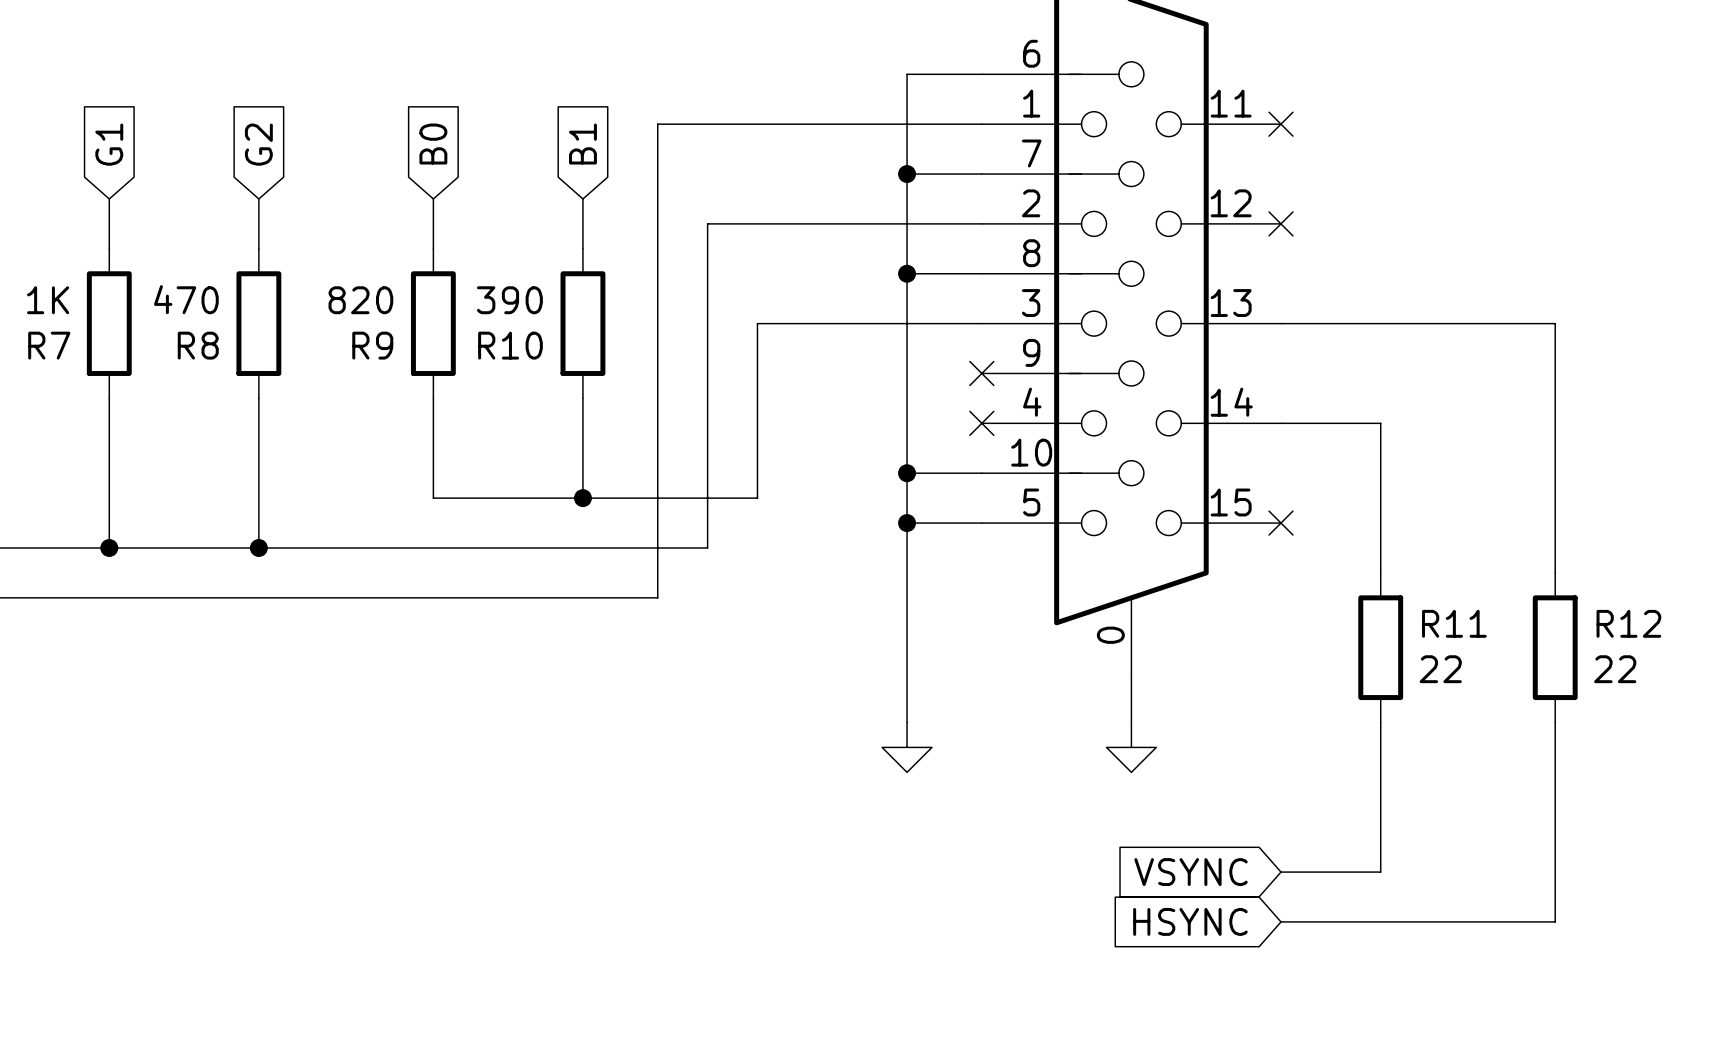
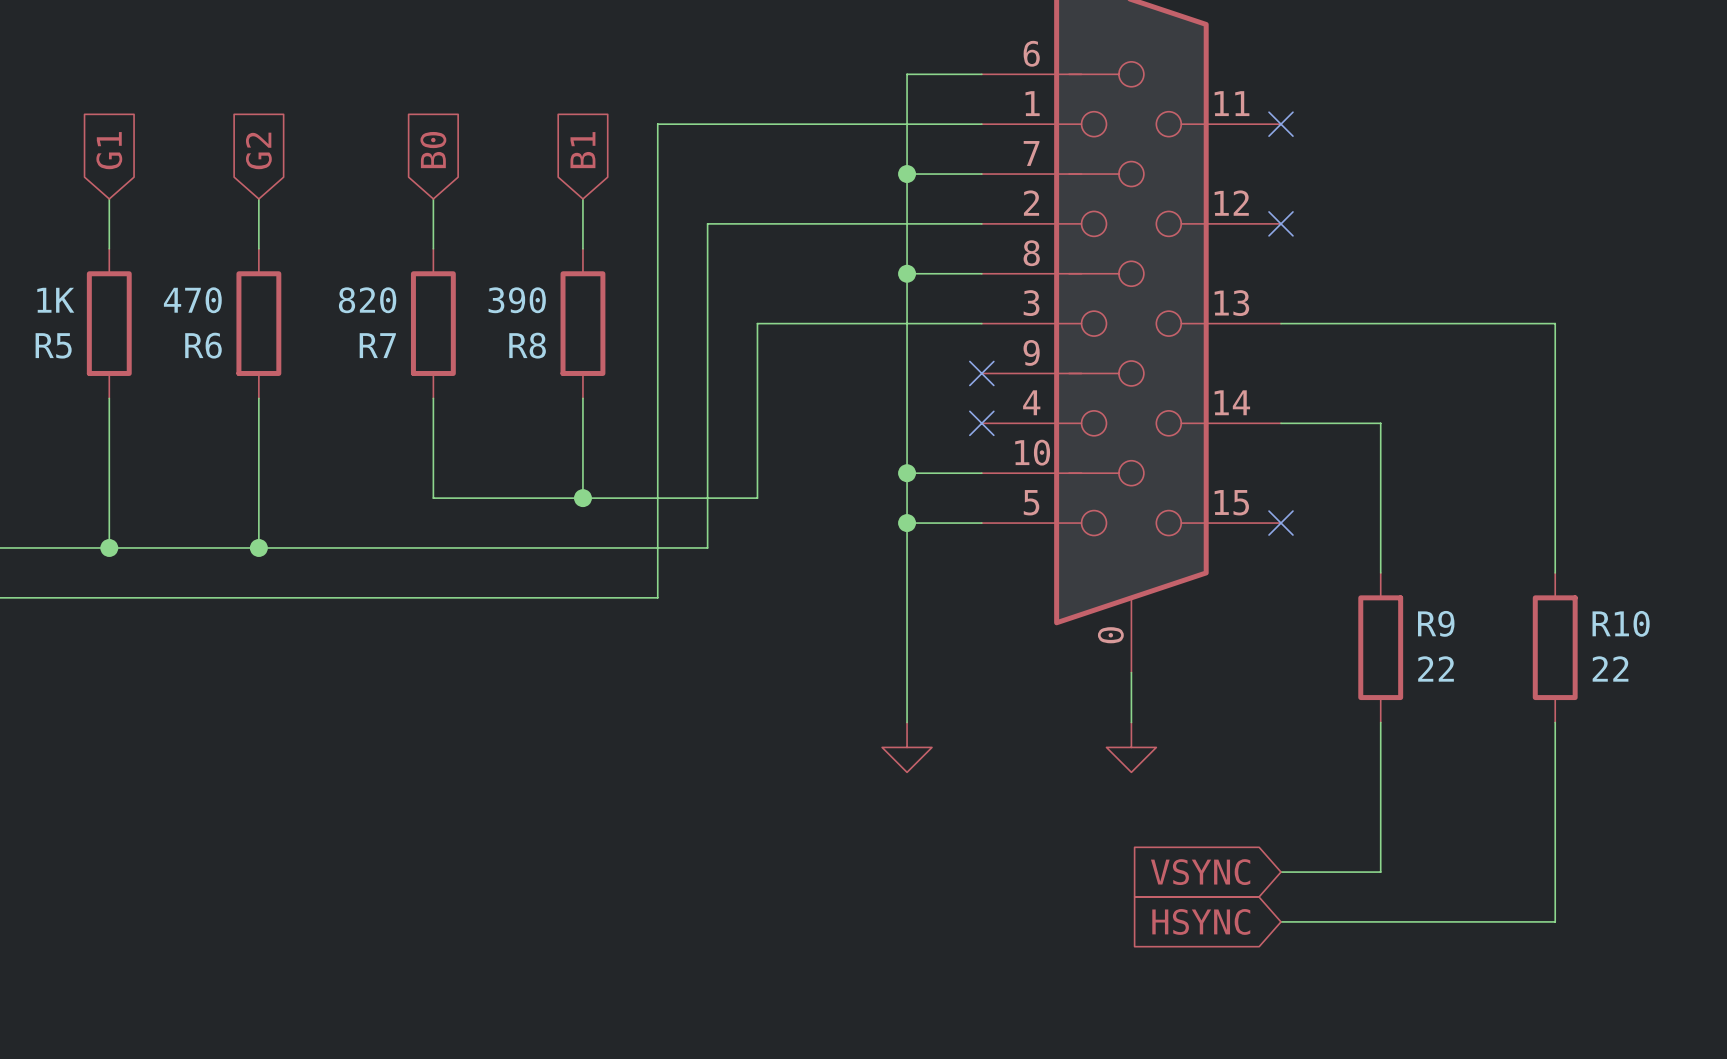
R7 name: R7 (49, 345) -> R5 (53, 345)
R8 name: R8 (198, 345) -> R6 (203, 345)
R9 name: R9 (372, 345) -> R7 (377, 345)
R10 name: R10 (510, 345) -> R8 (527, 345)
R11 name: R11 (1454, 623) -> R9 (1436, 623)
R12 name: R12 (1628, 623) -> R10 (1621, 623)

